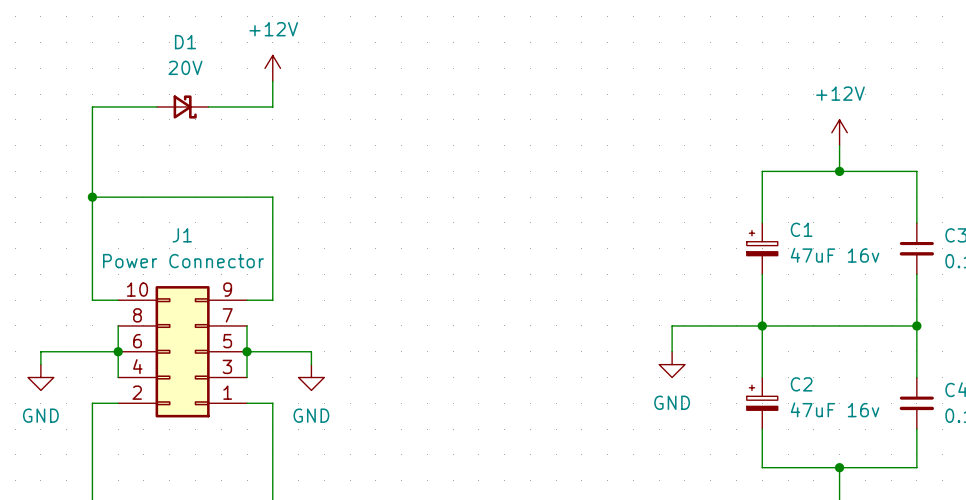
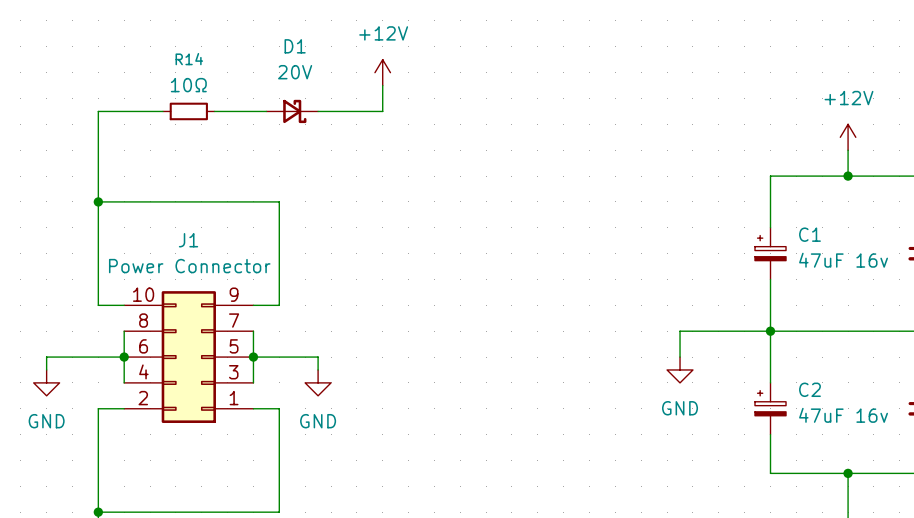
power symbol position: +12V (272, 68) -> +12V (382, 72)
wire: (272, 81) (272, 106) (259, 106) -> none
wire: none -> (382, 85) (382, 111) (318, 111)
D1 position: (182, 106) -> (292, 111)
R14: none -> 10Ω (188, 111)

